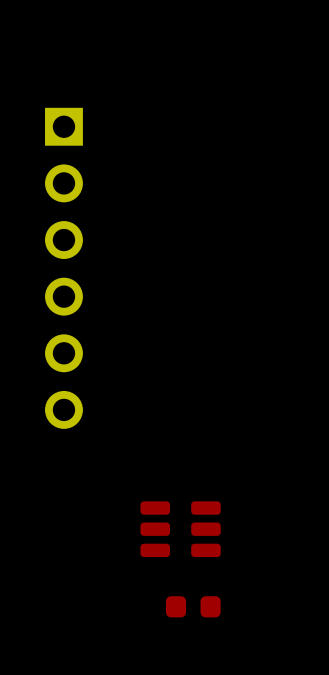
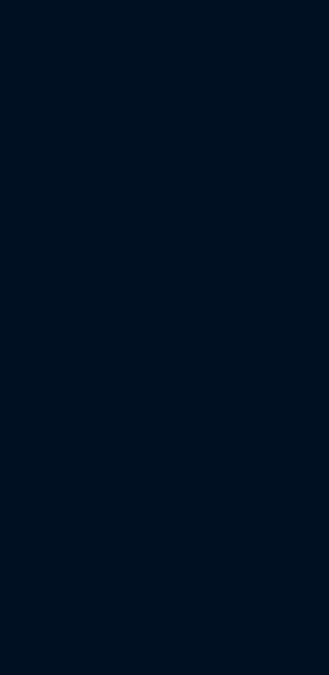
part: (63, 268) -> none
part: (180, 529) -> none
part: (193, 606) -> none

